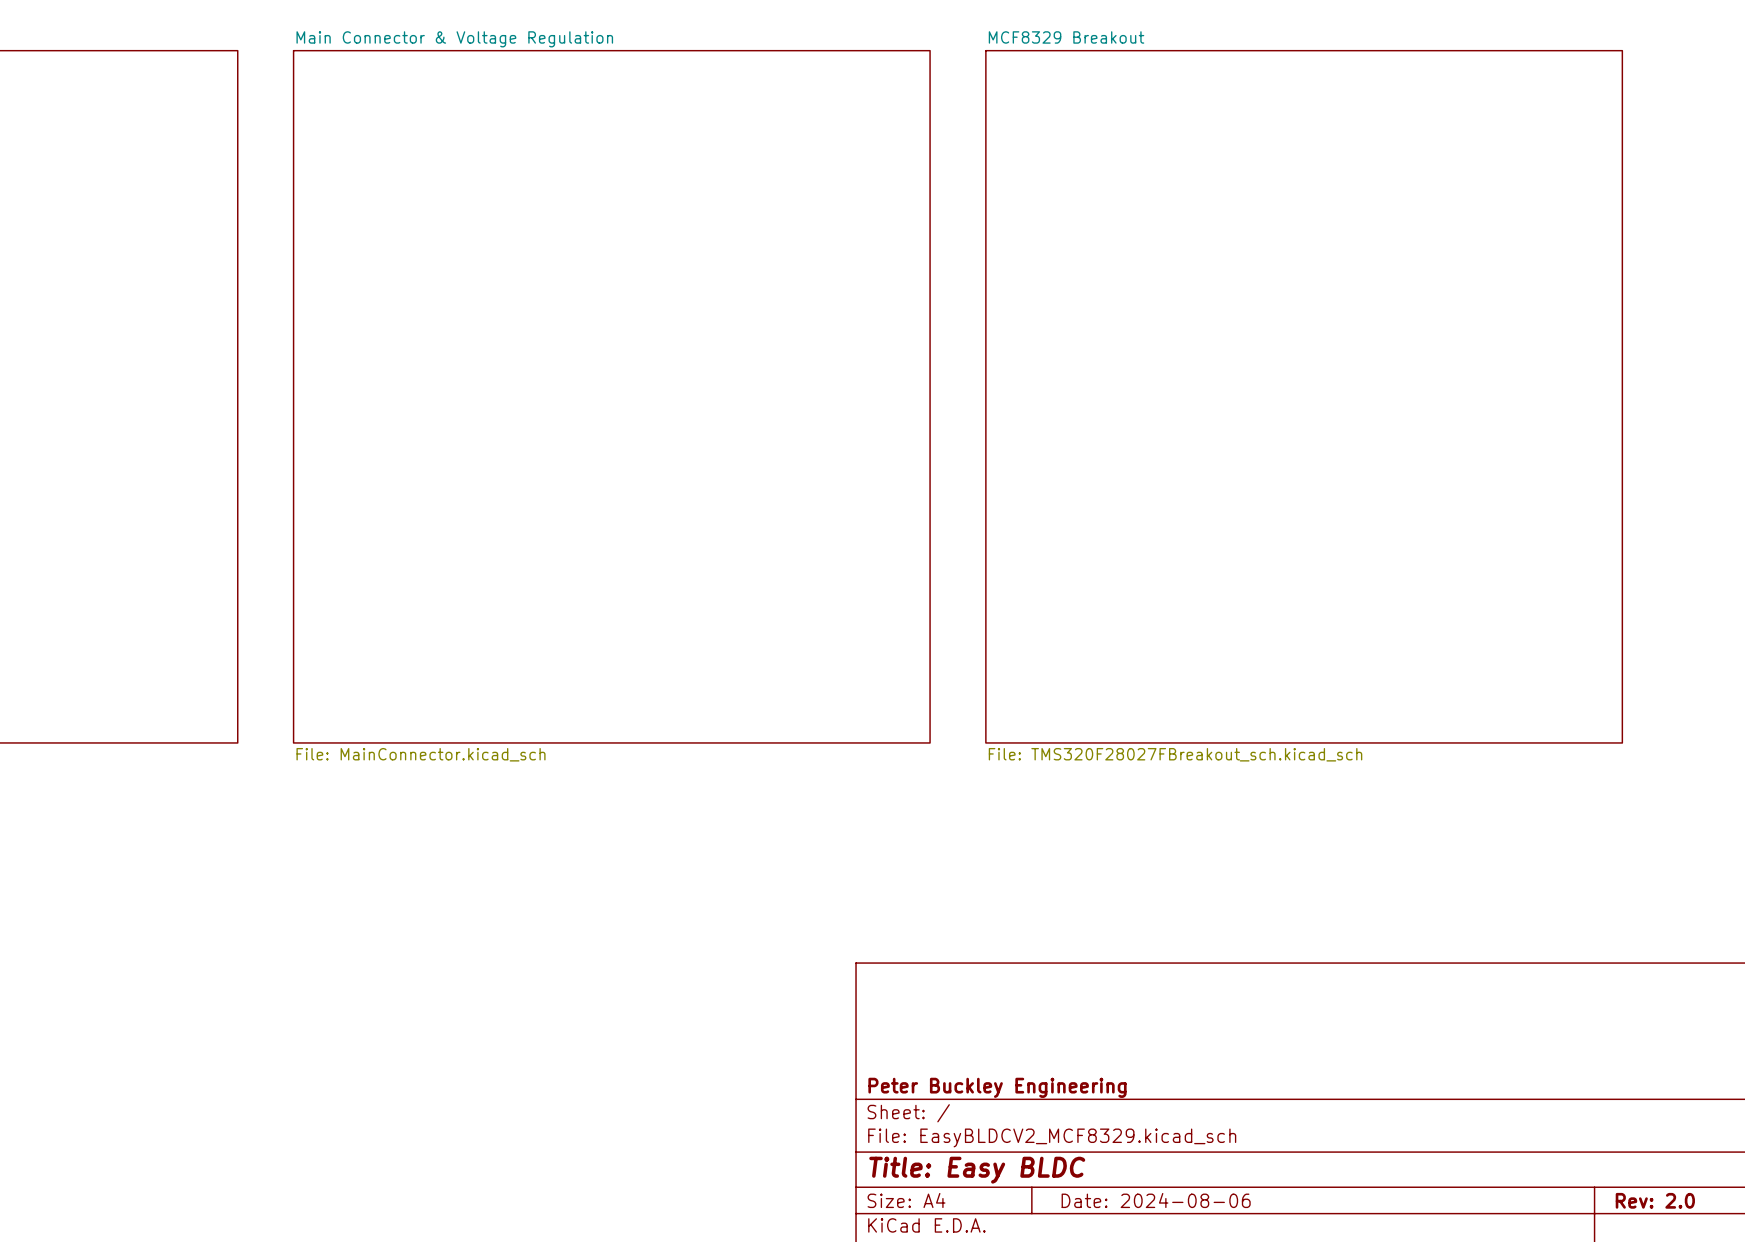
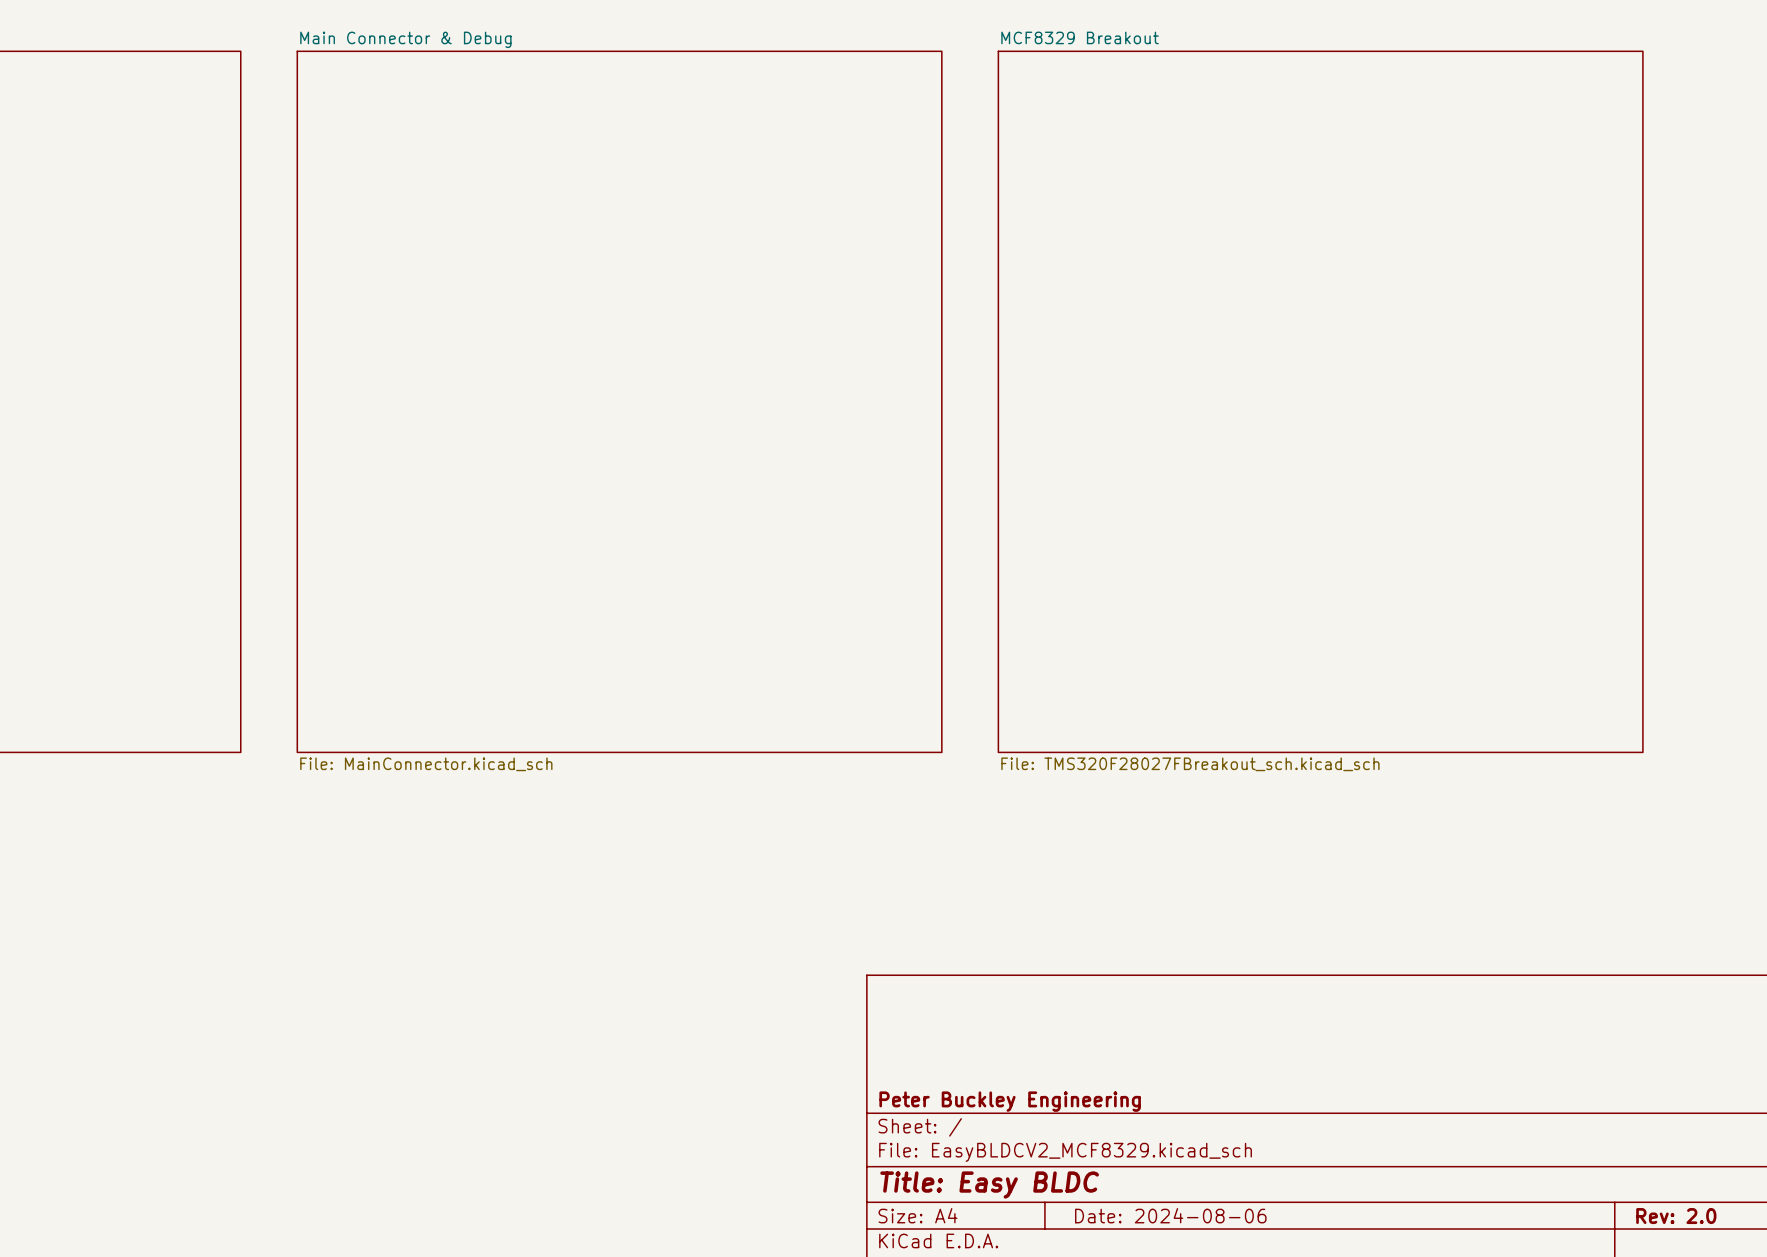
sheet Main Connector & Voltage Regulation name: Main Connector & Voltage Regulation (454, 39) -> Main Connector & Debug (405, 39)

